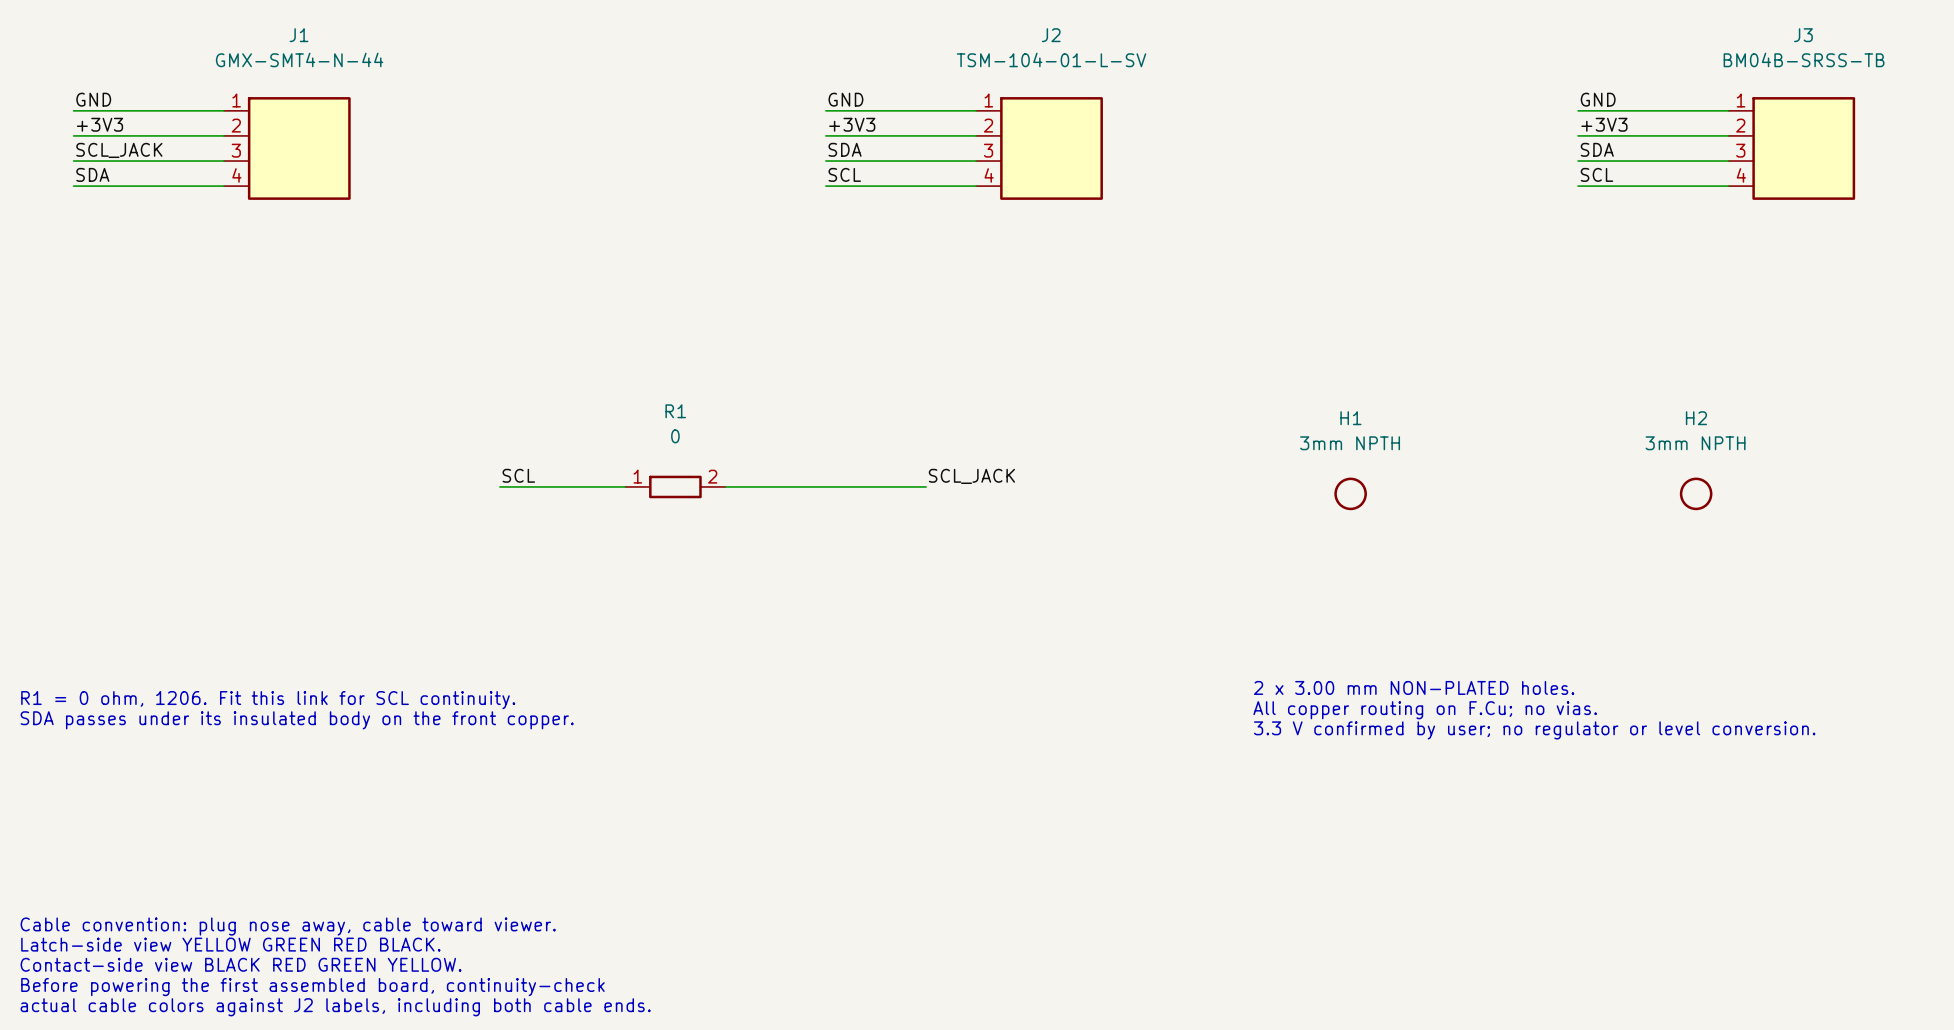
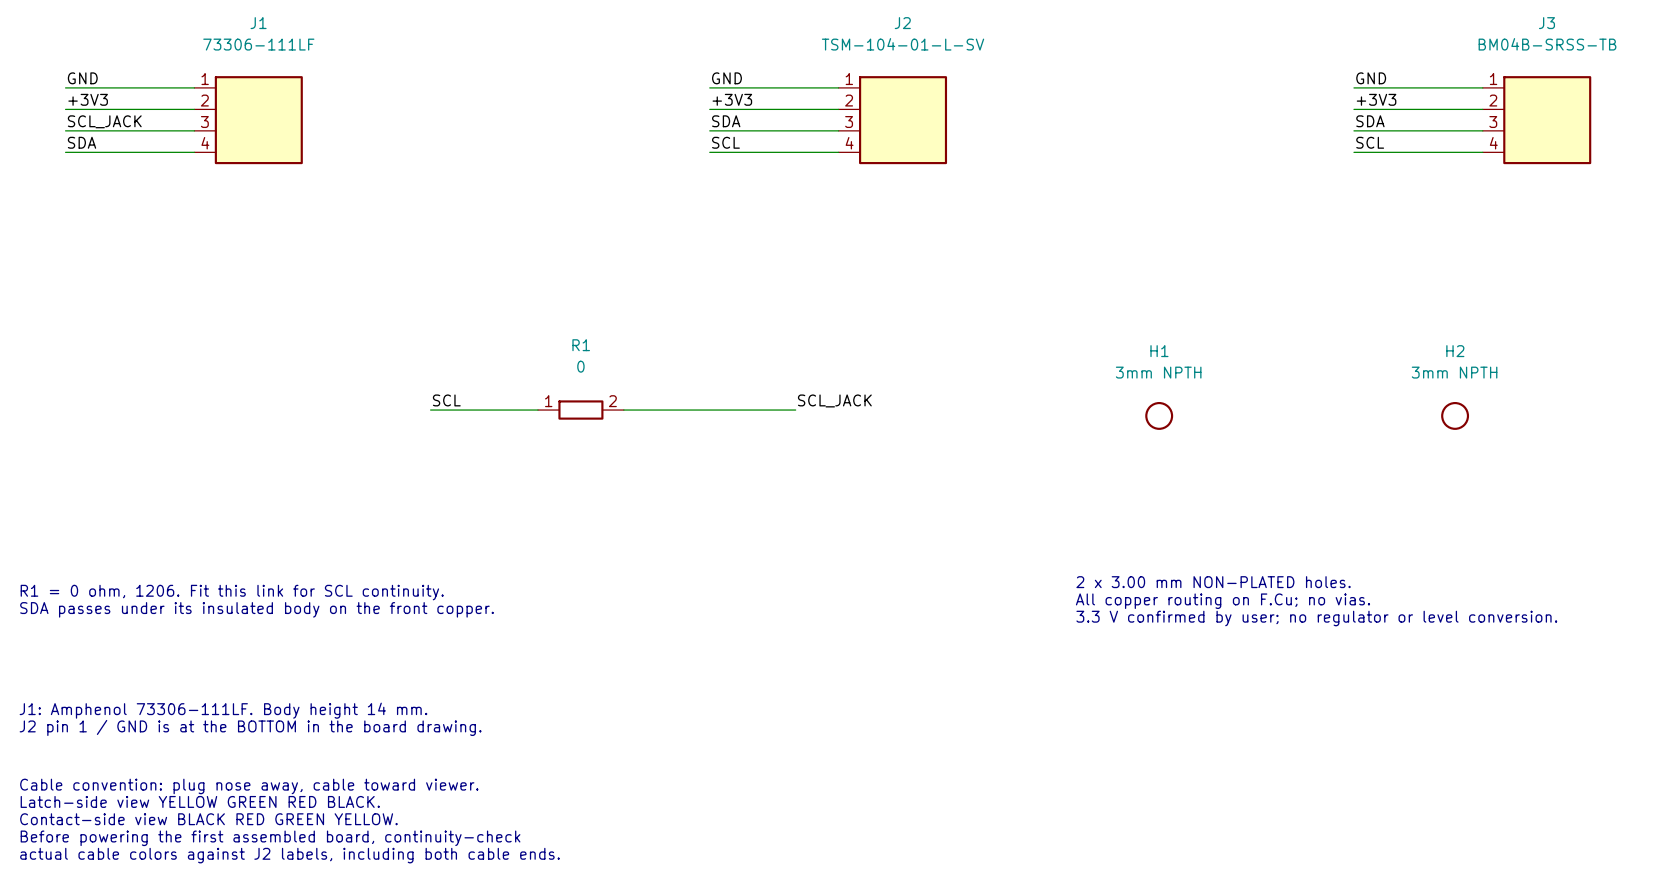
J1 value: GMX-SMT4-N-44 (299, 59) -> 73306-111LF (258, 44)
text: none -> J1: Amphenol 73306-111LF. Body height 14 mm. (223, 710)
text: none -> J2 pin 1 / GND is at the BOTTOM in the board drawing. (250, 727)

